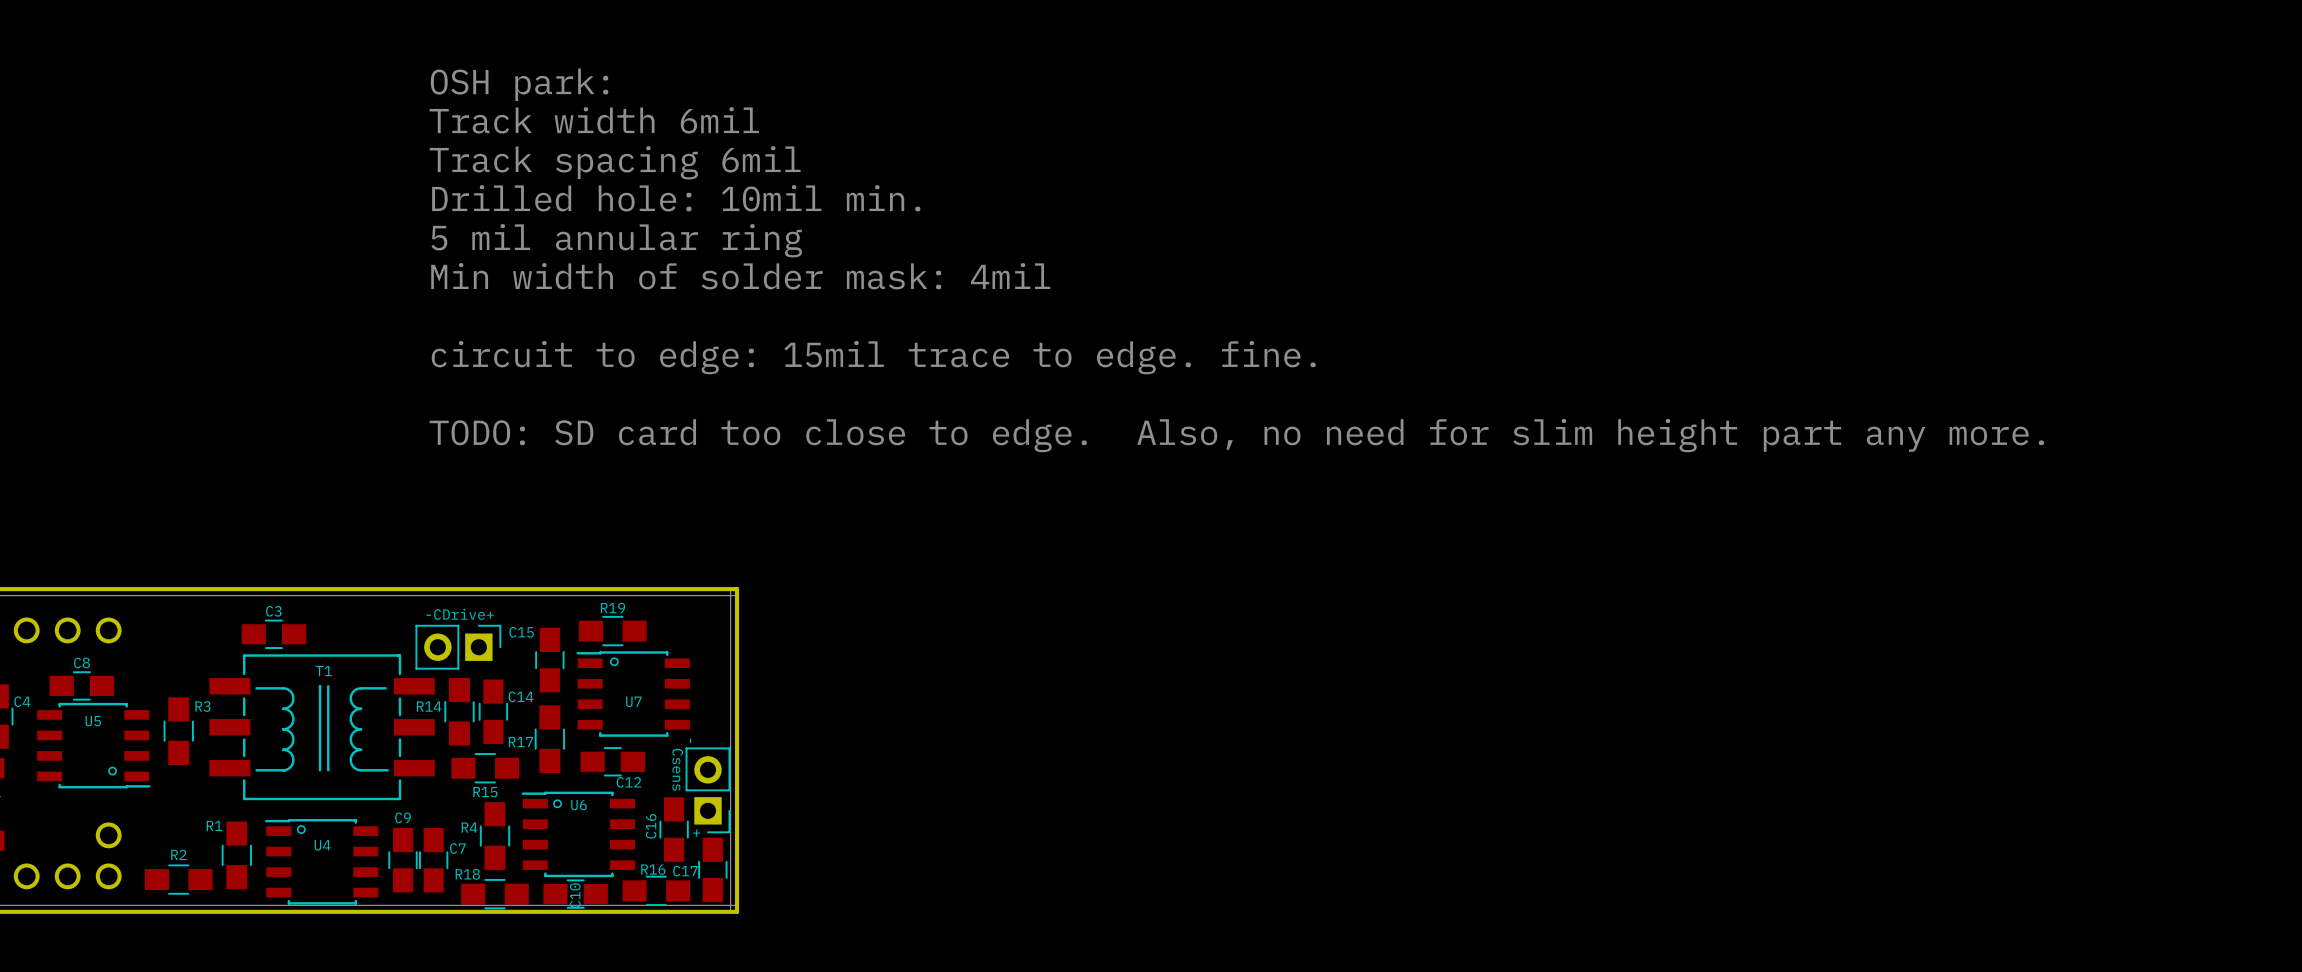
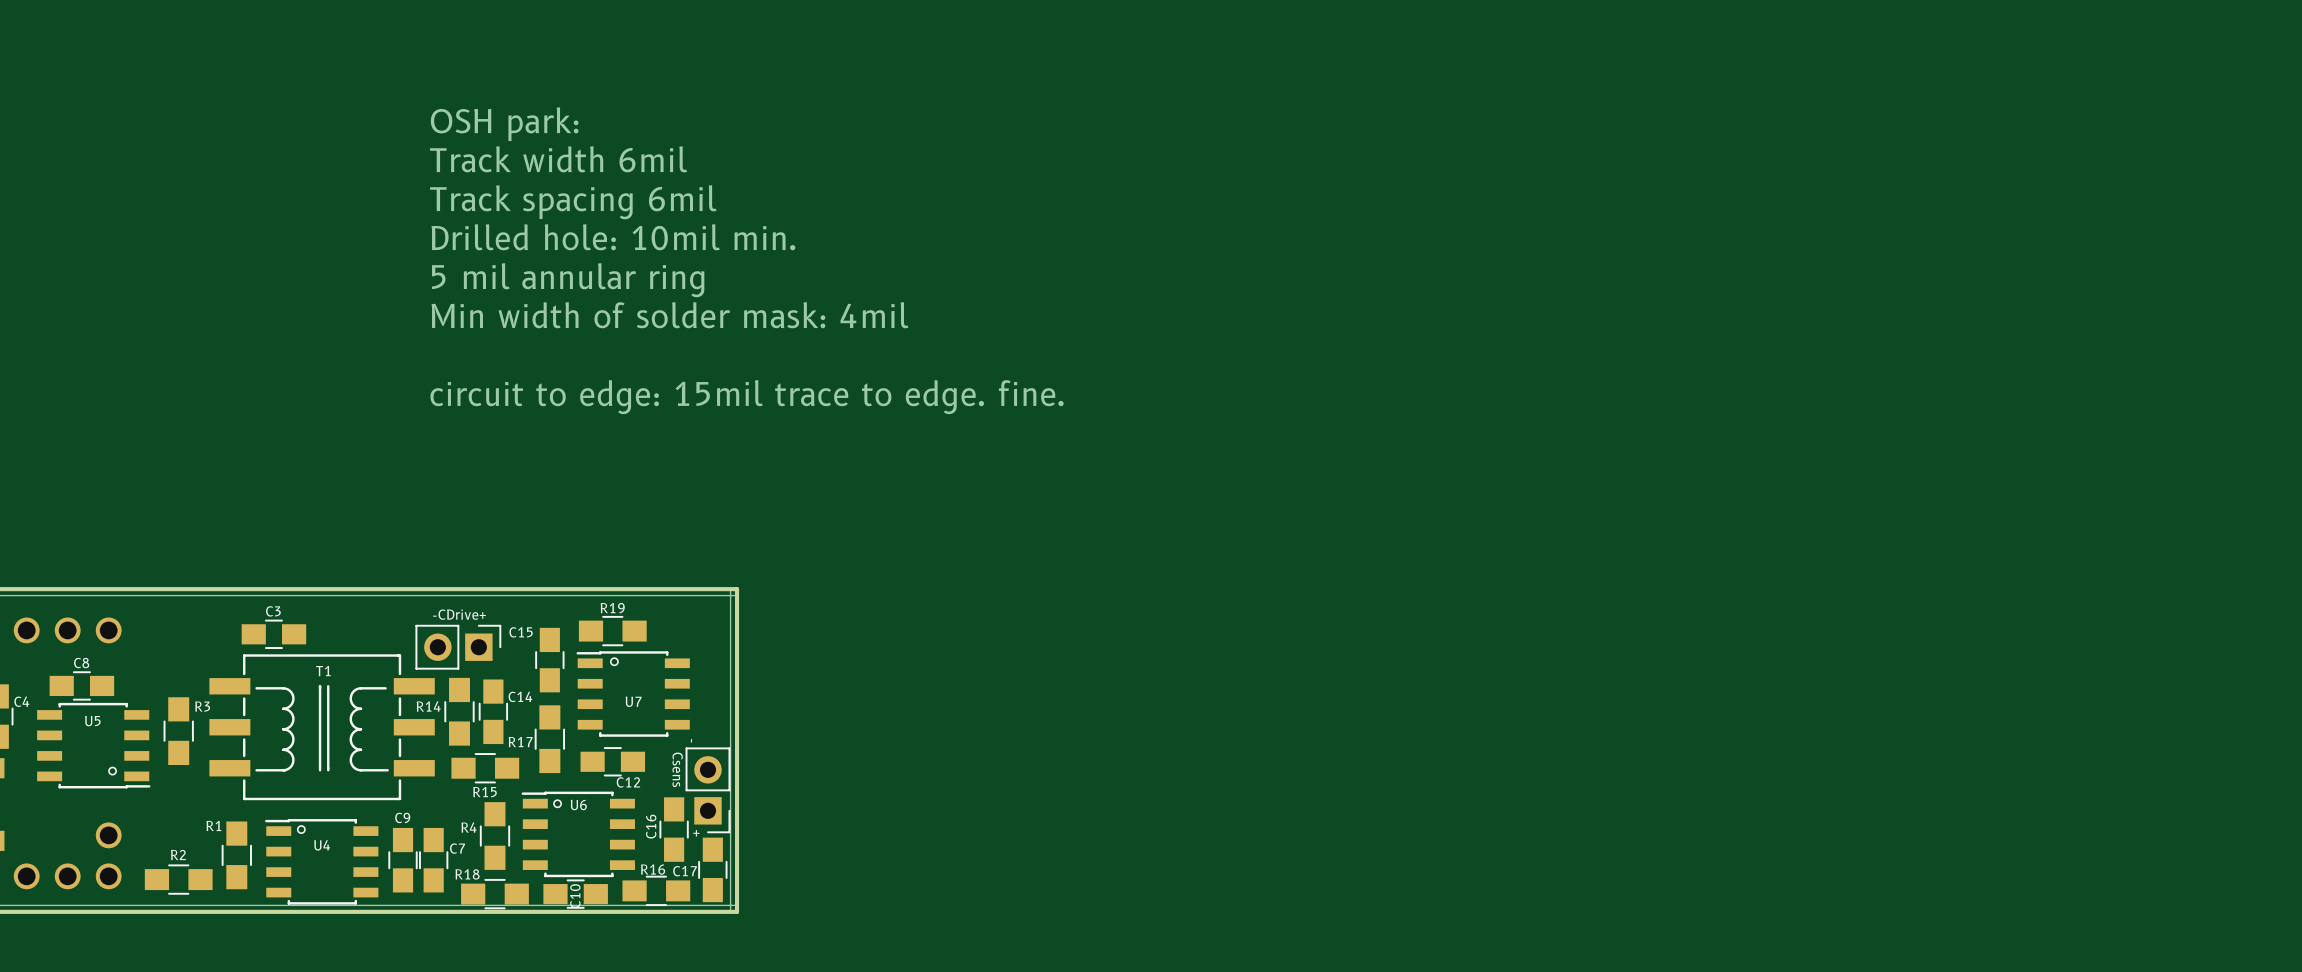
text: OSH park: (519, 84) -> none
text: Track width 6mil (594, 120) -> OSH park: (504, 124)
text: Track spacing 6mil (615, 162) -> Track width 6mil (558, 159)
text: Drilled hole: 10mil min. (676, 198) -> Track spacing 6mil (573, 202)
text: 5 mil annular ring (616, 240) -> Drilled hole: 10mil min. (613, 237)
text: Min width of solder mask: 4mil (740, 276) -> 5 mil annular ring (568, 280)
text: none -> Min width of solder mask: 4mil (670, 315)
text position: circuit to edge: 15mil trace to edge. fine. (873, 357) -> circuit to edge: 15mil trace to edge. fine. (747, 397)
text: TODO: SD card too close to edge. Also, no need for slim height part any more. (1236, 435) -> none

